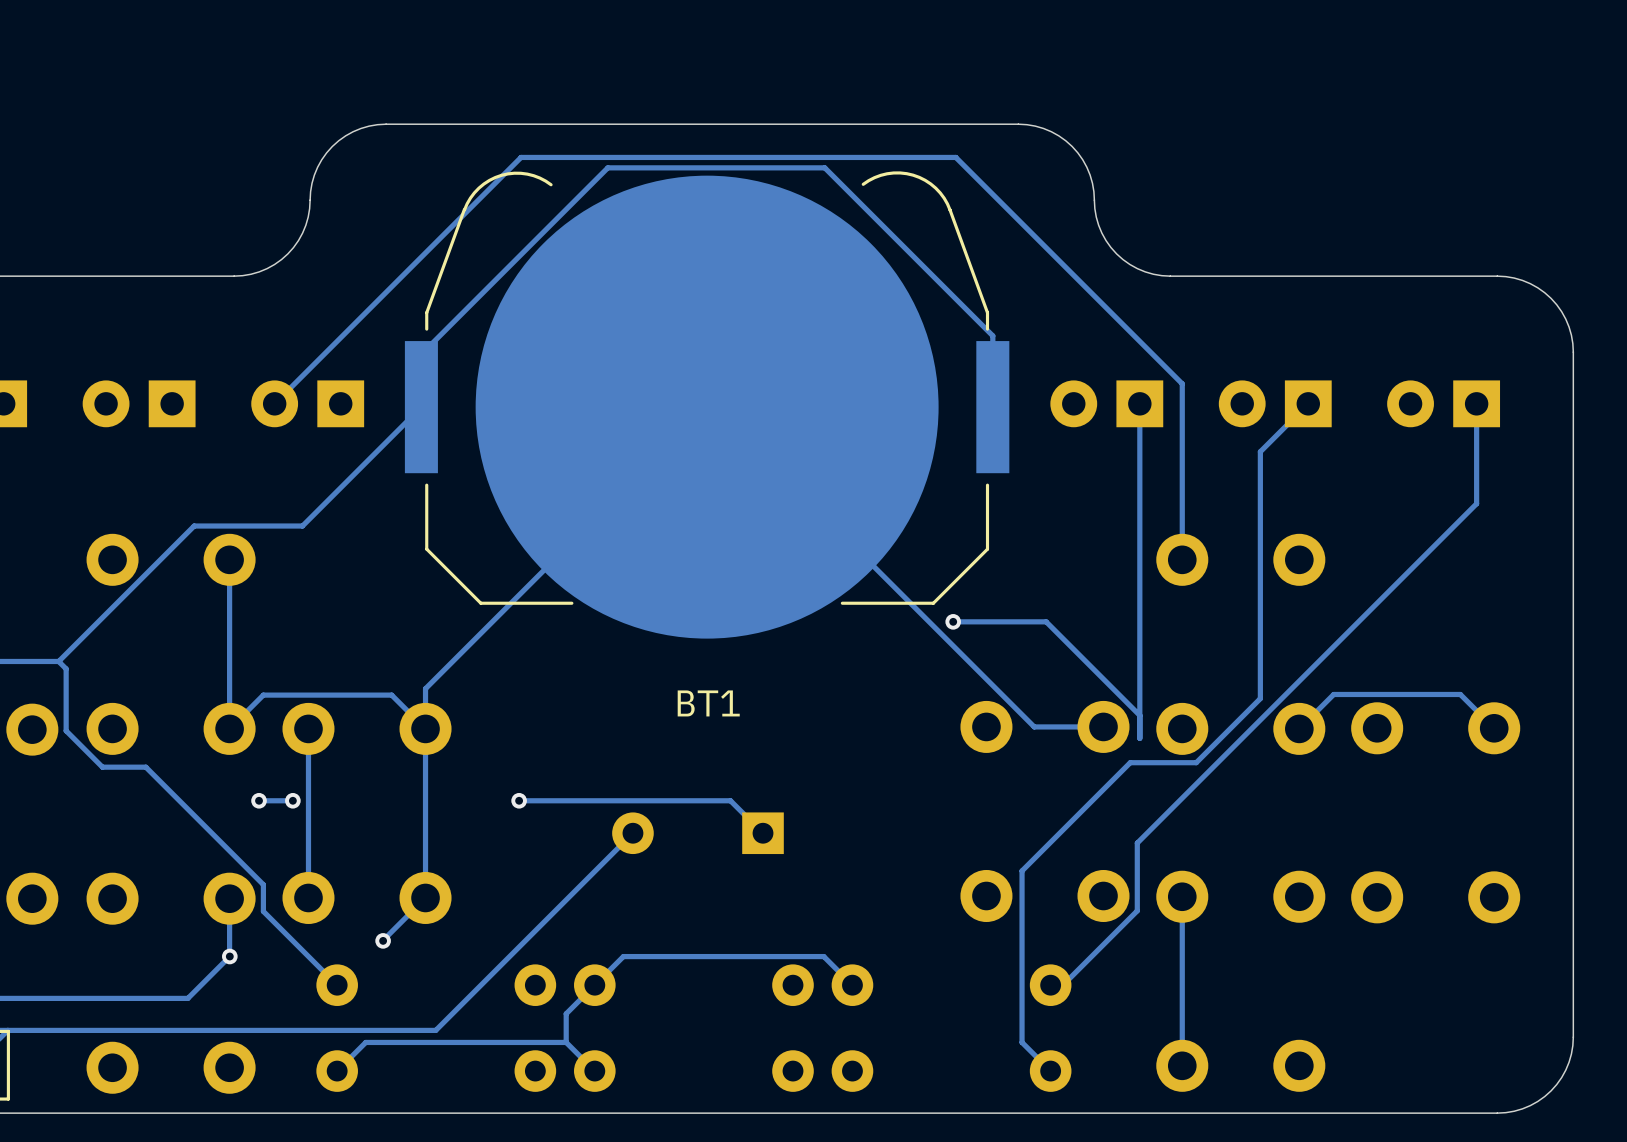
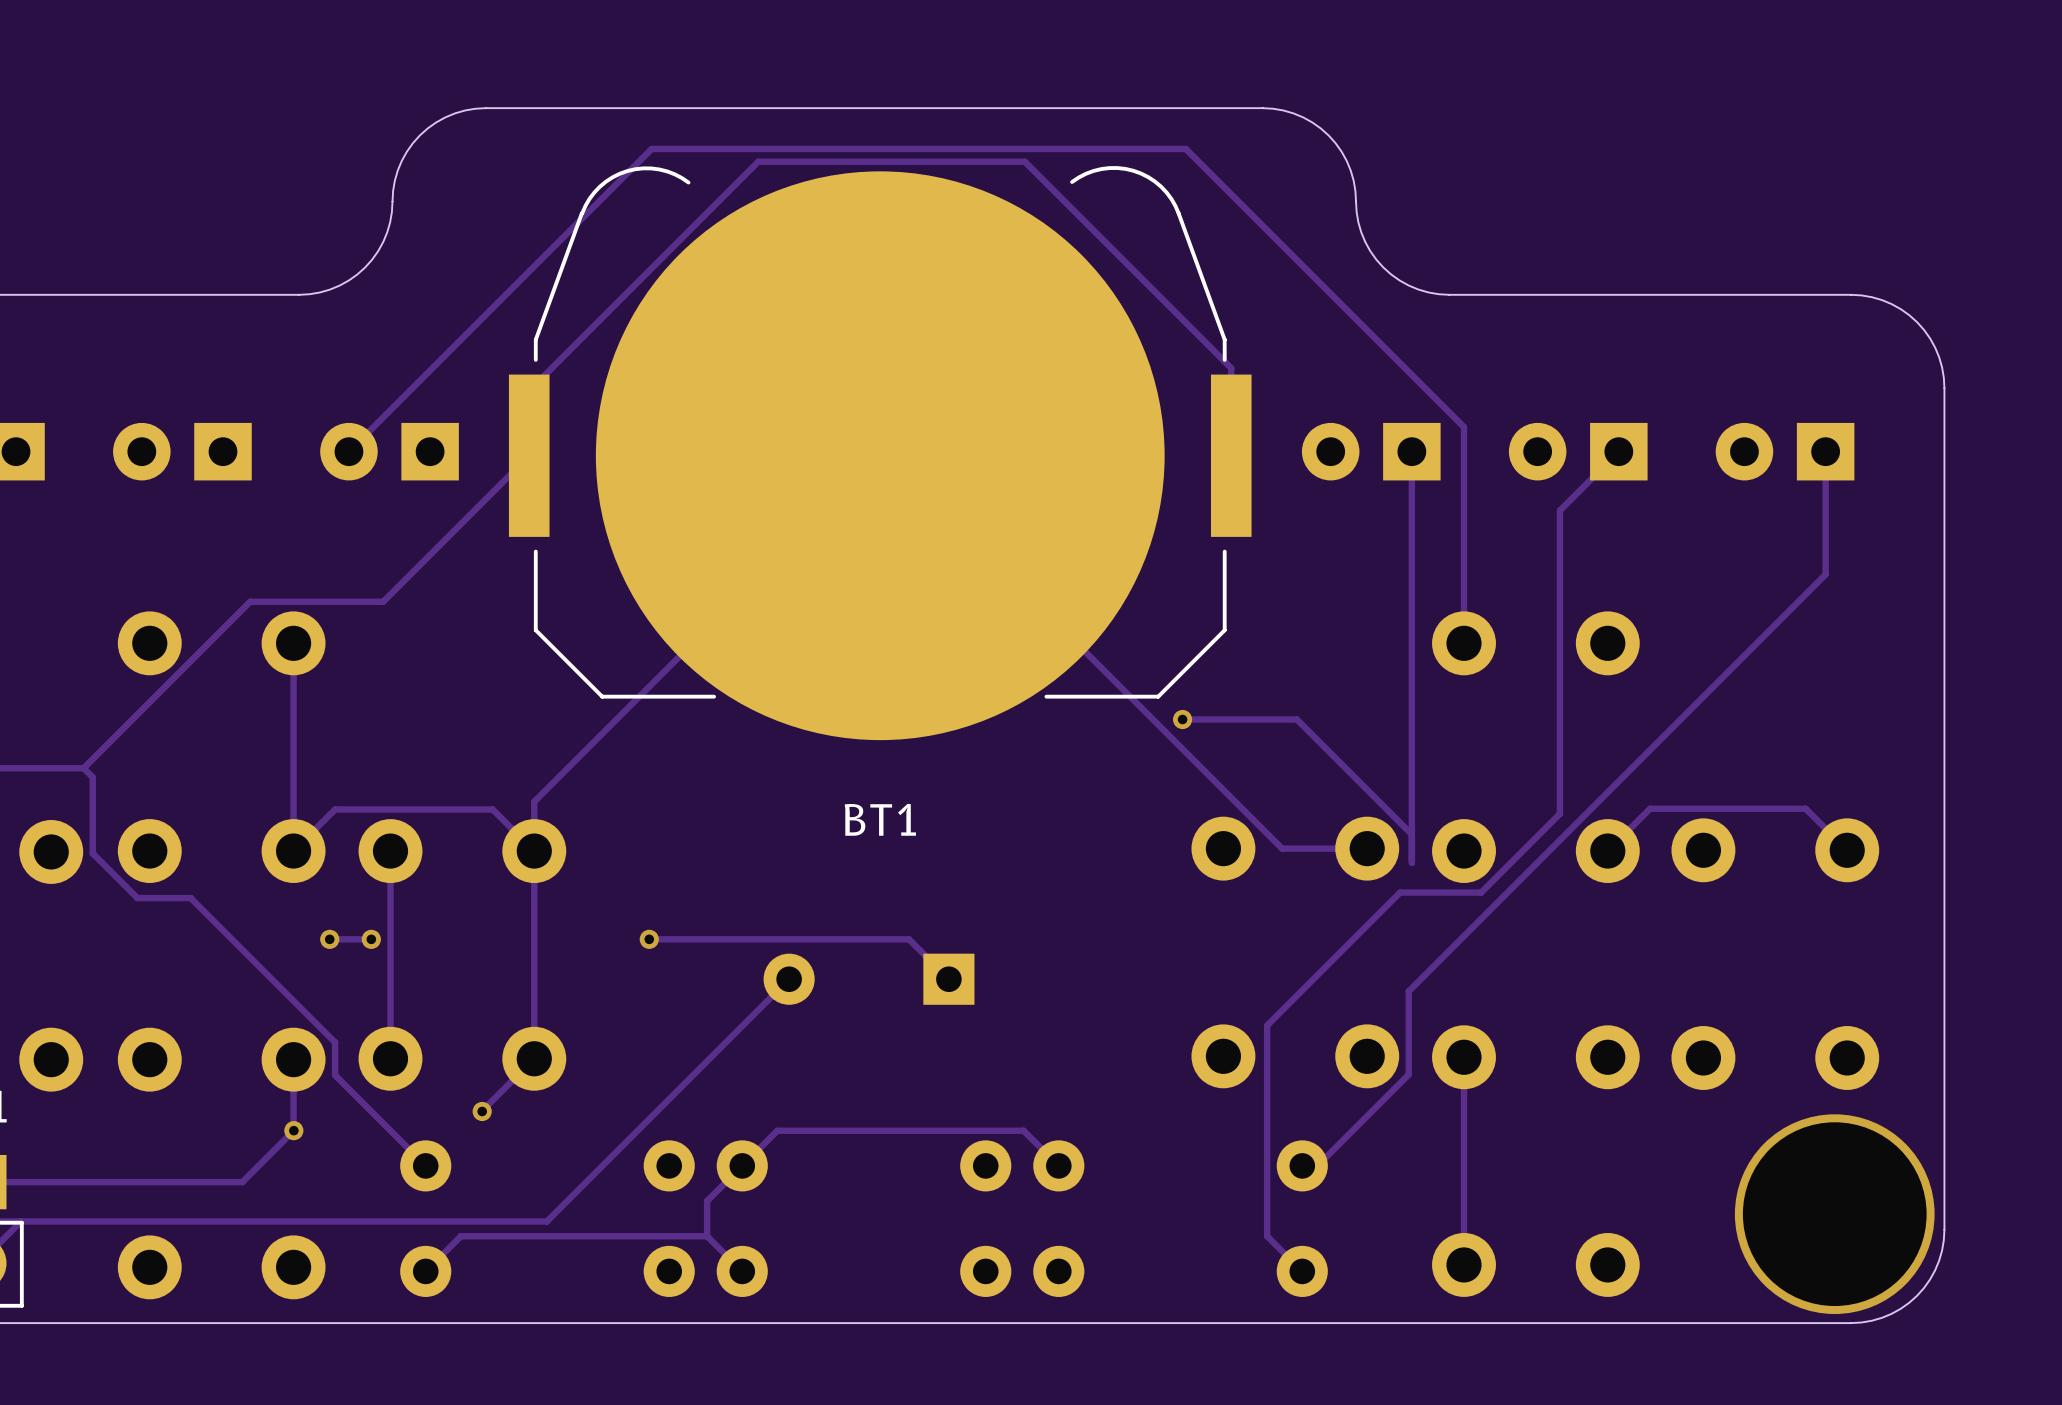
via: none -> (1834, 1214)

